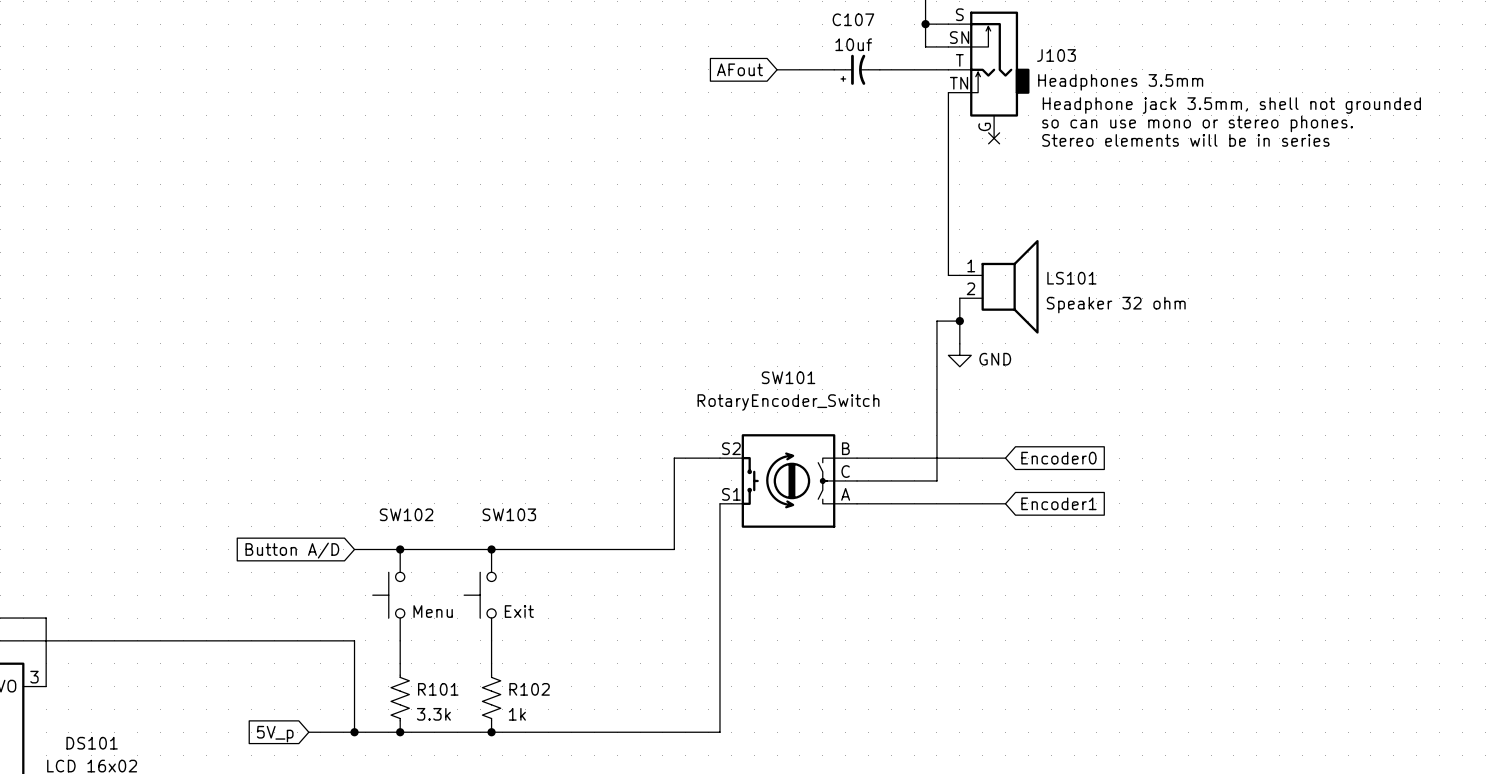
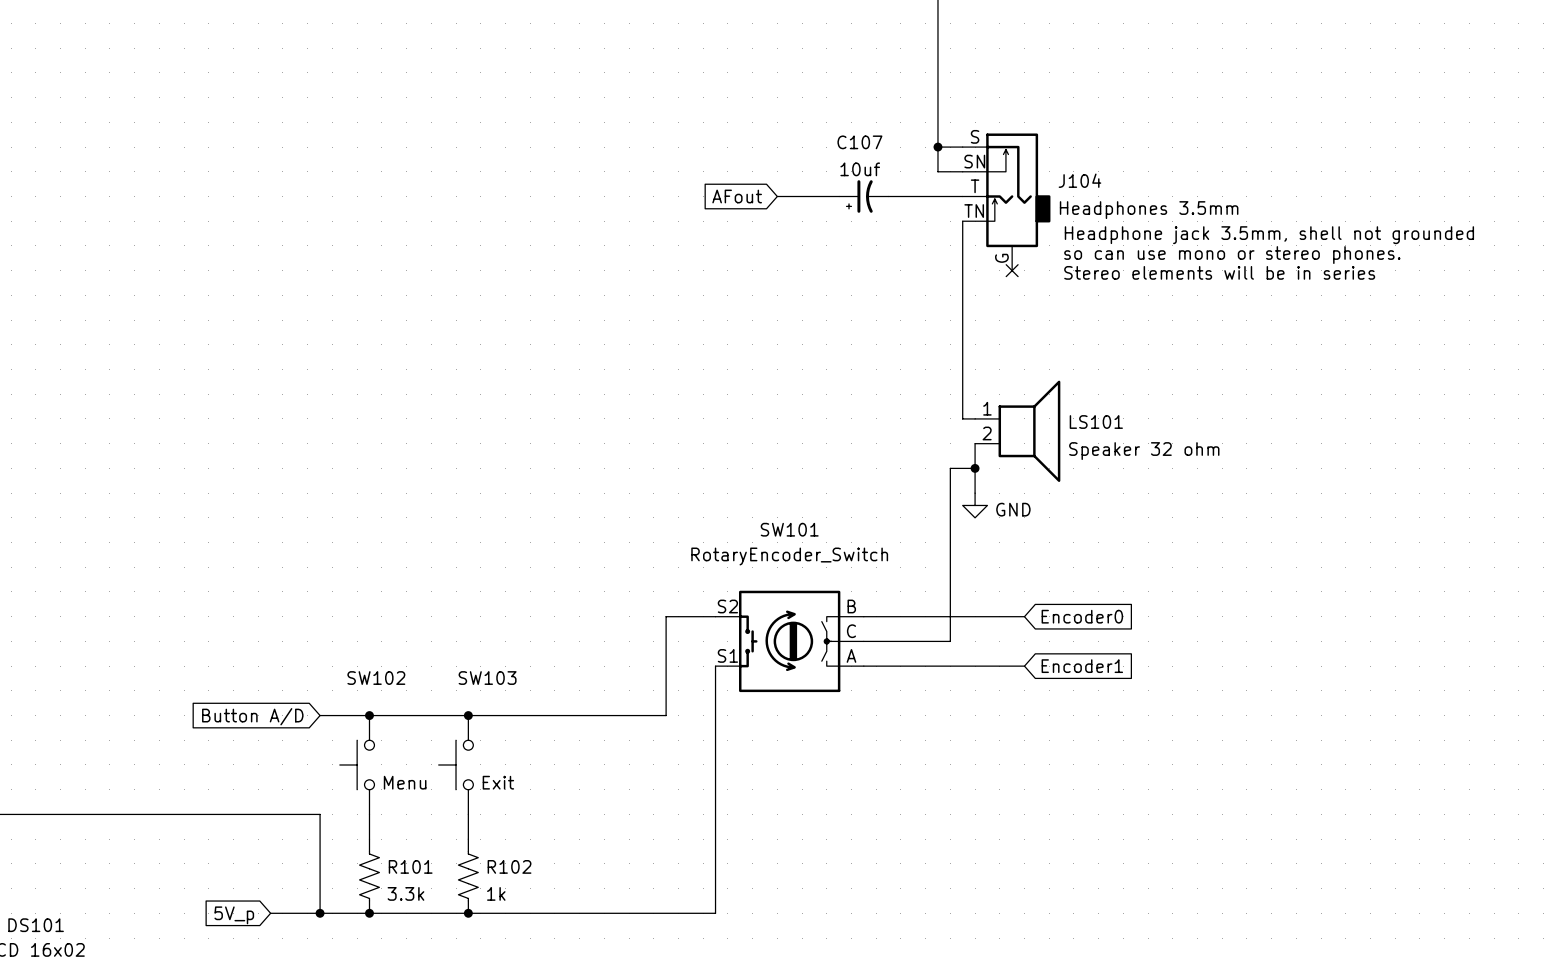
J103 name: J103 (1056, 55) -> J104 (1079, 180)

